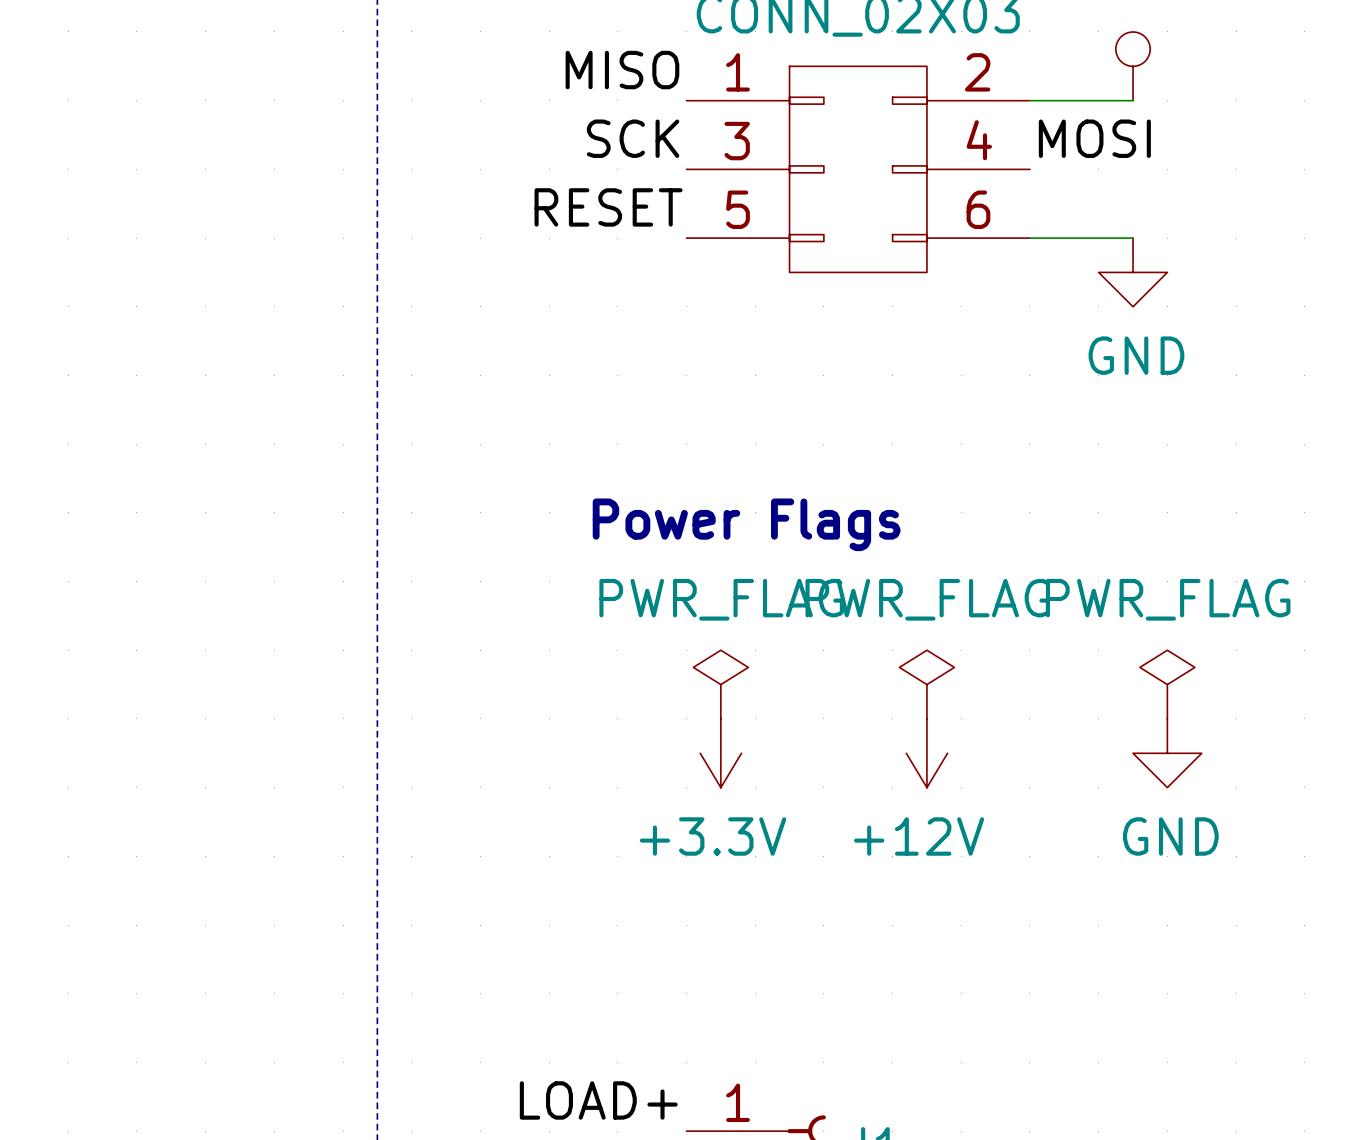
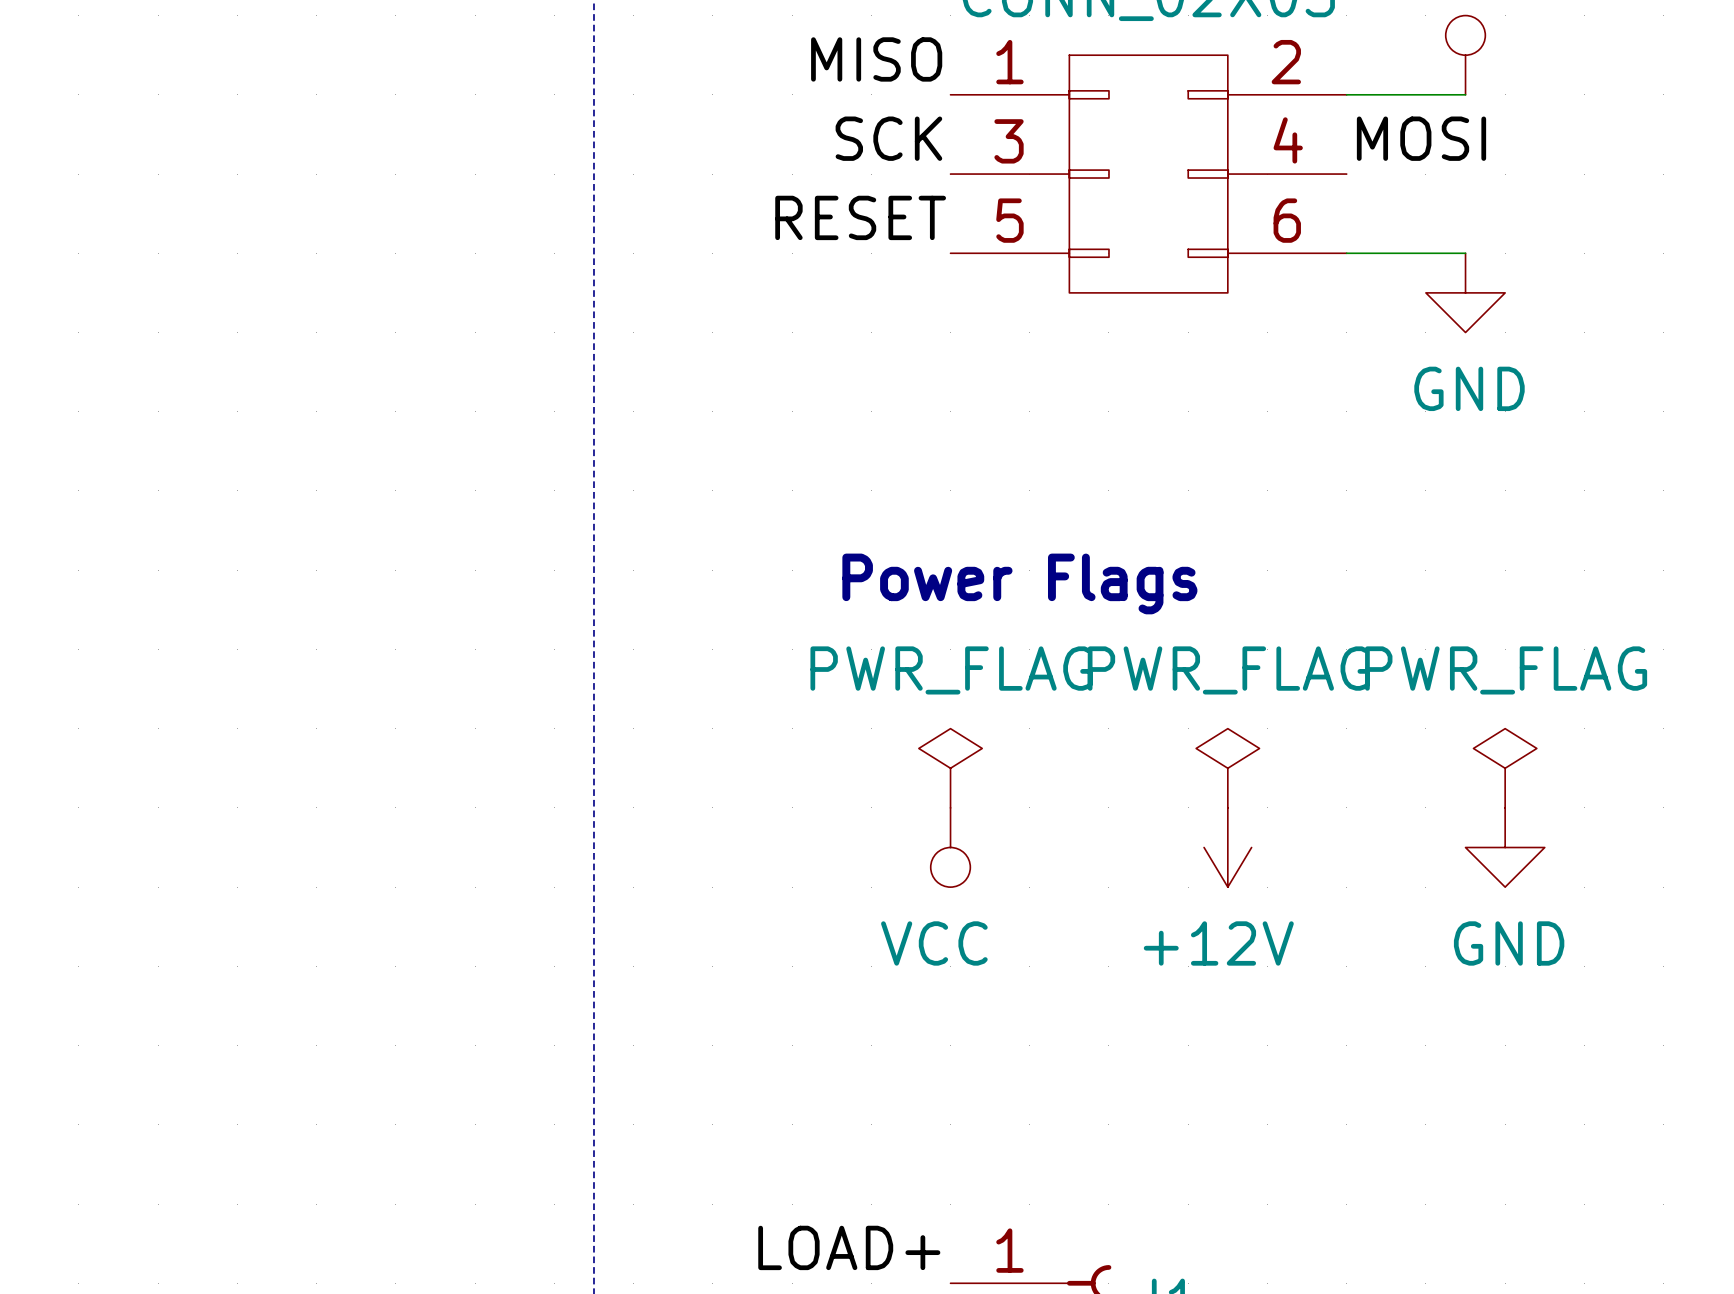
power symbol position: PWR_FLAG (720, 684) -> PWR_FLAG (950, 768)
power symbol: none -> VCC (950, 847)
power symbol: +3.3V (720, 753) -> none

